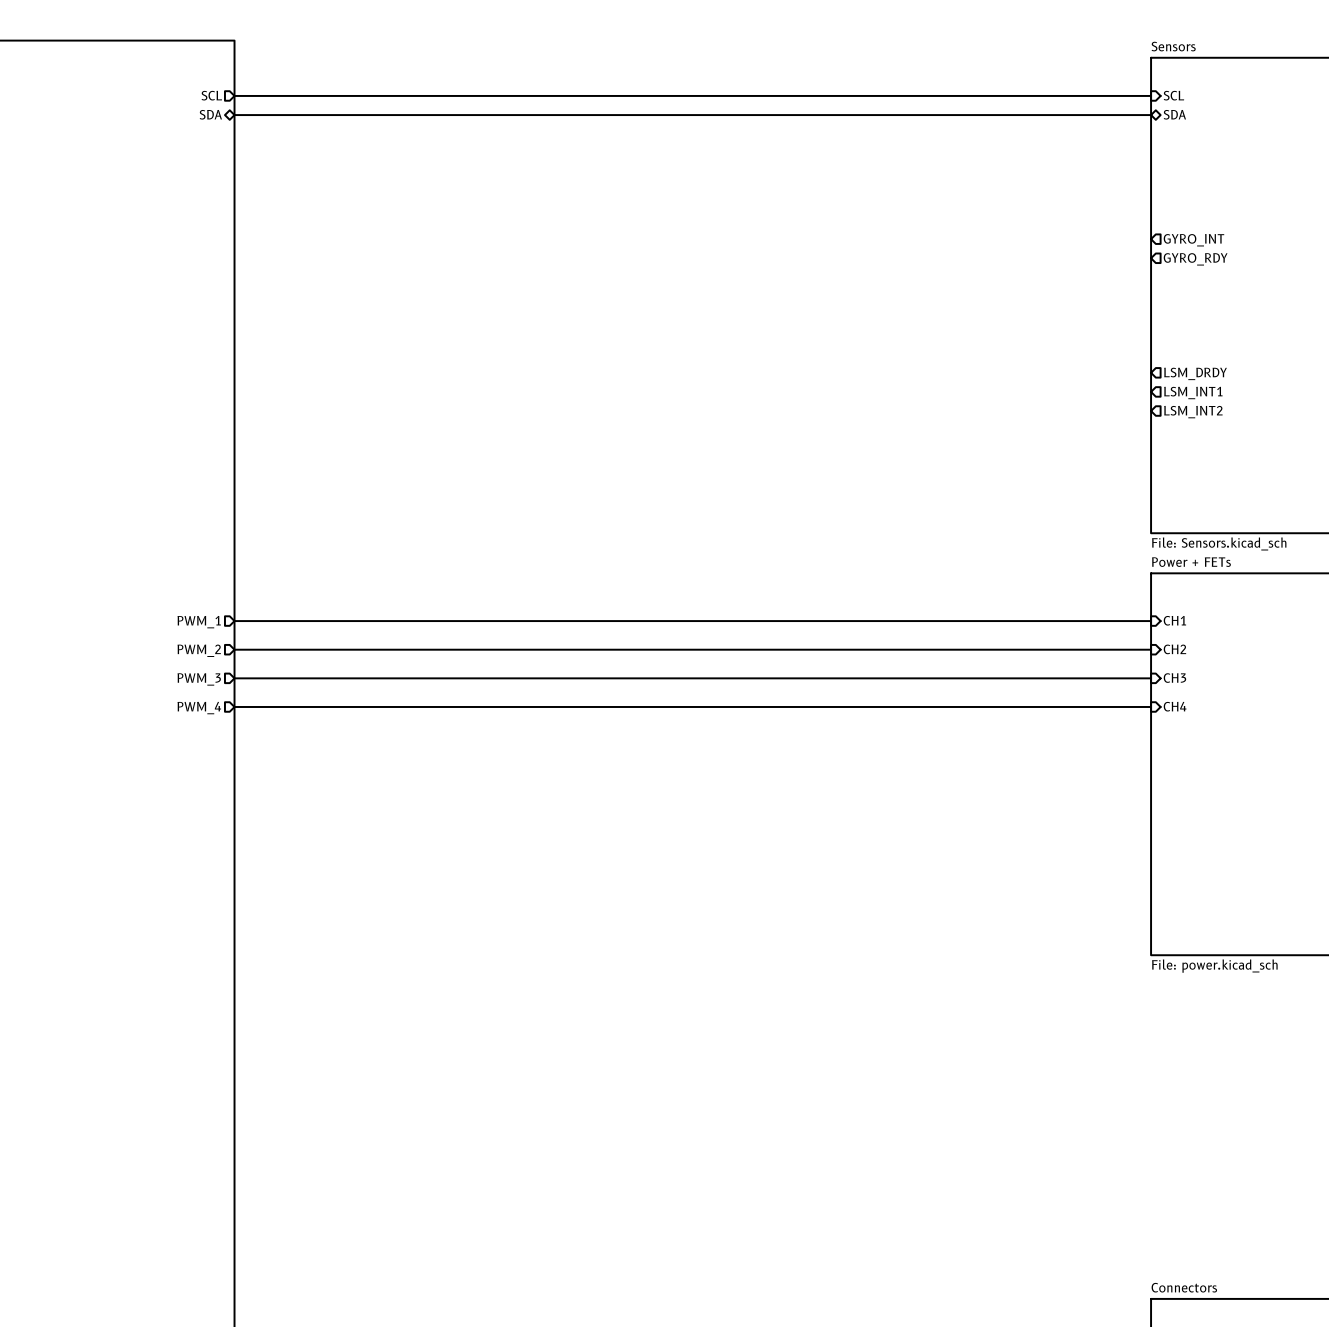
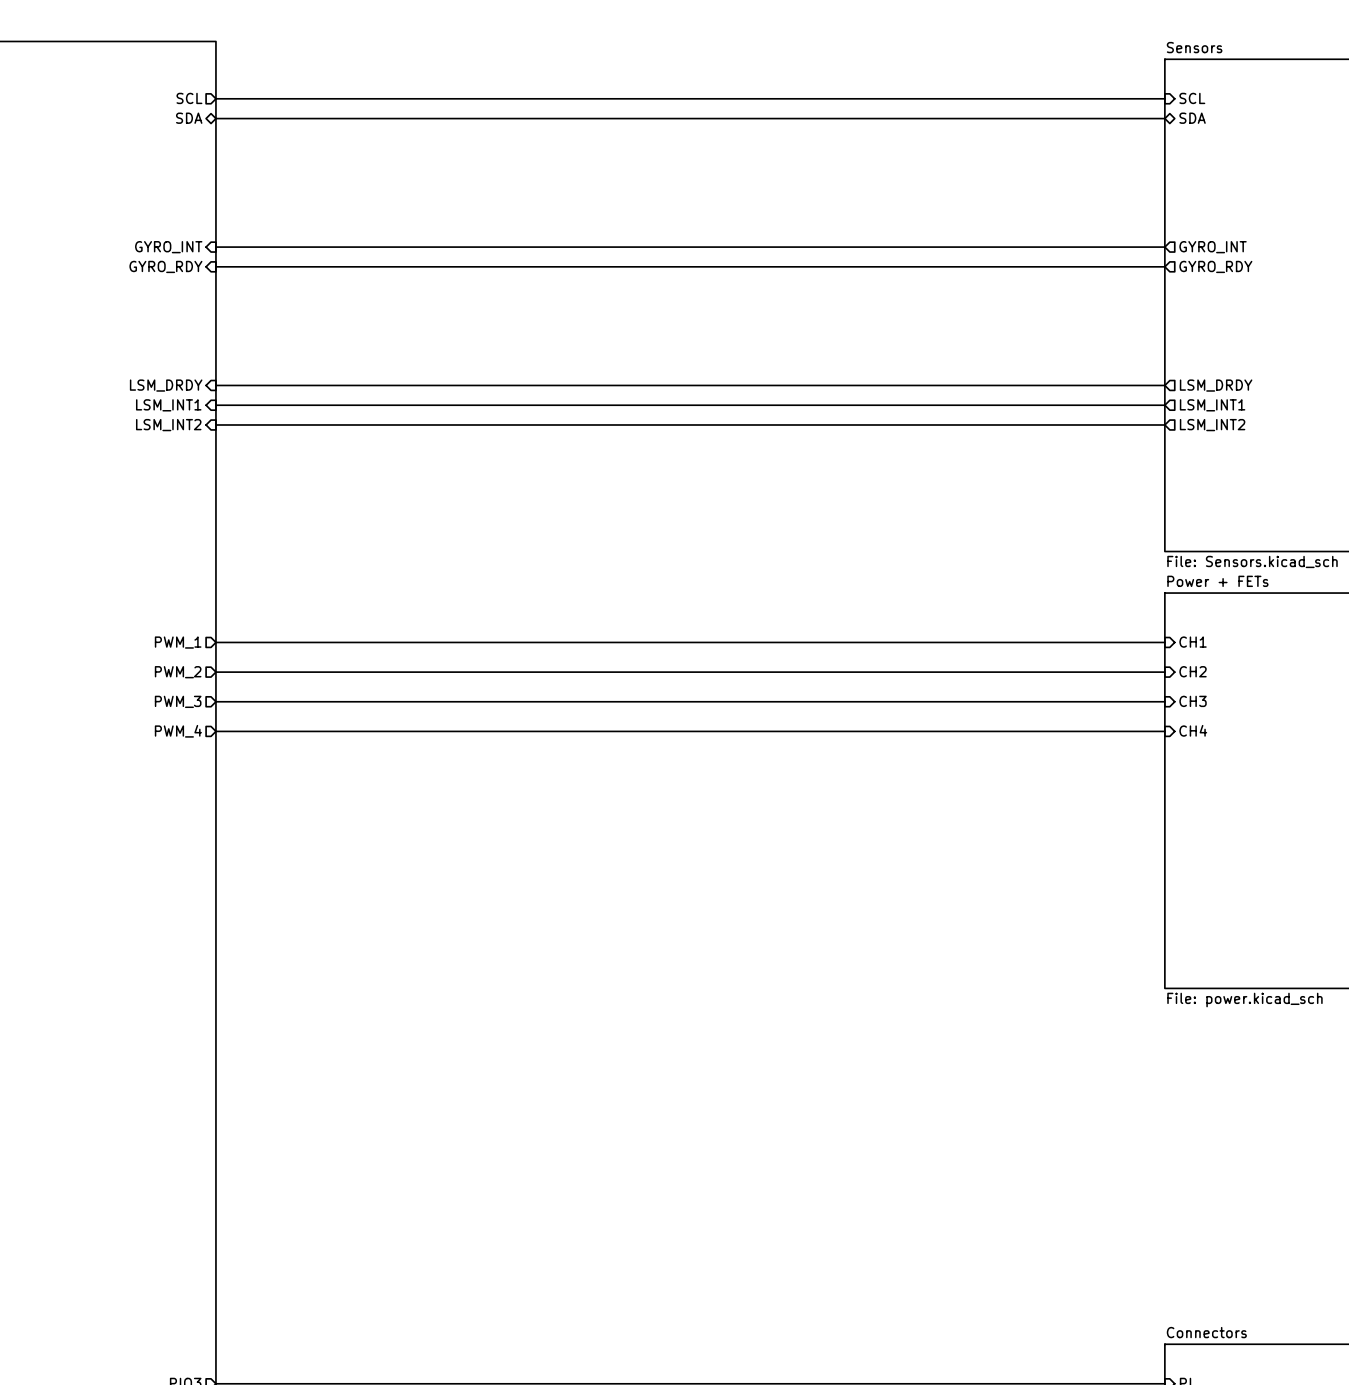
wire: none -> (215, 247) (1164, 247)
sheet pin: none -> GYRO_INT (168, 247)
wire: none -> (215, 266) (1164, 266)
sheet pin: none -> GYRO_RDY (165, 266)
wire: none -> (215, 385) (1164, 385)
sheet pin: none -> LSM_DRDY (166, 385)
wire: none -> (215, 405) (1164, 405)
sheet pin: none -> LSM_INT1 (168, 405)
wire: none -> (215, 425) (1164, 425)
sheet pin: none -> LSM_INT2 (168, 425)

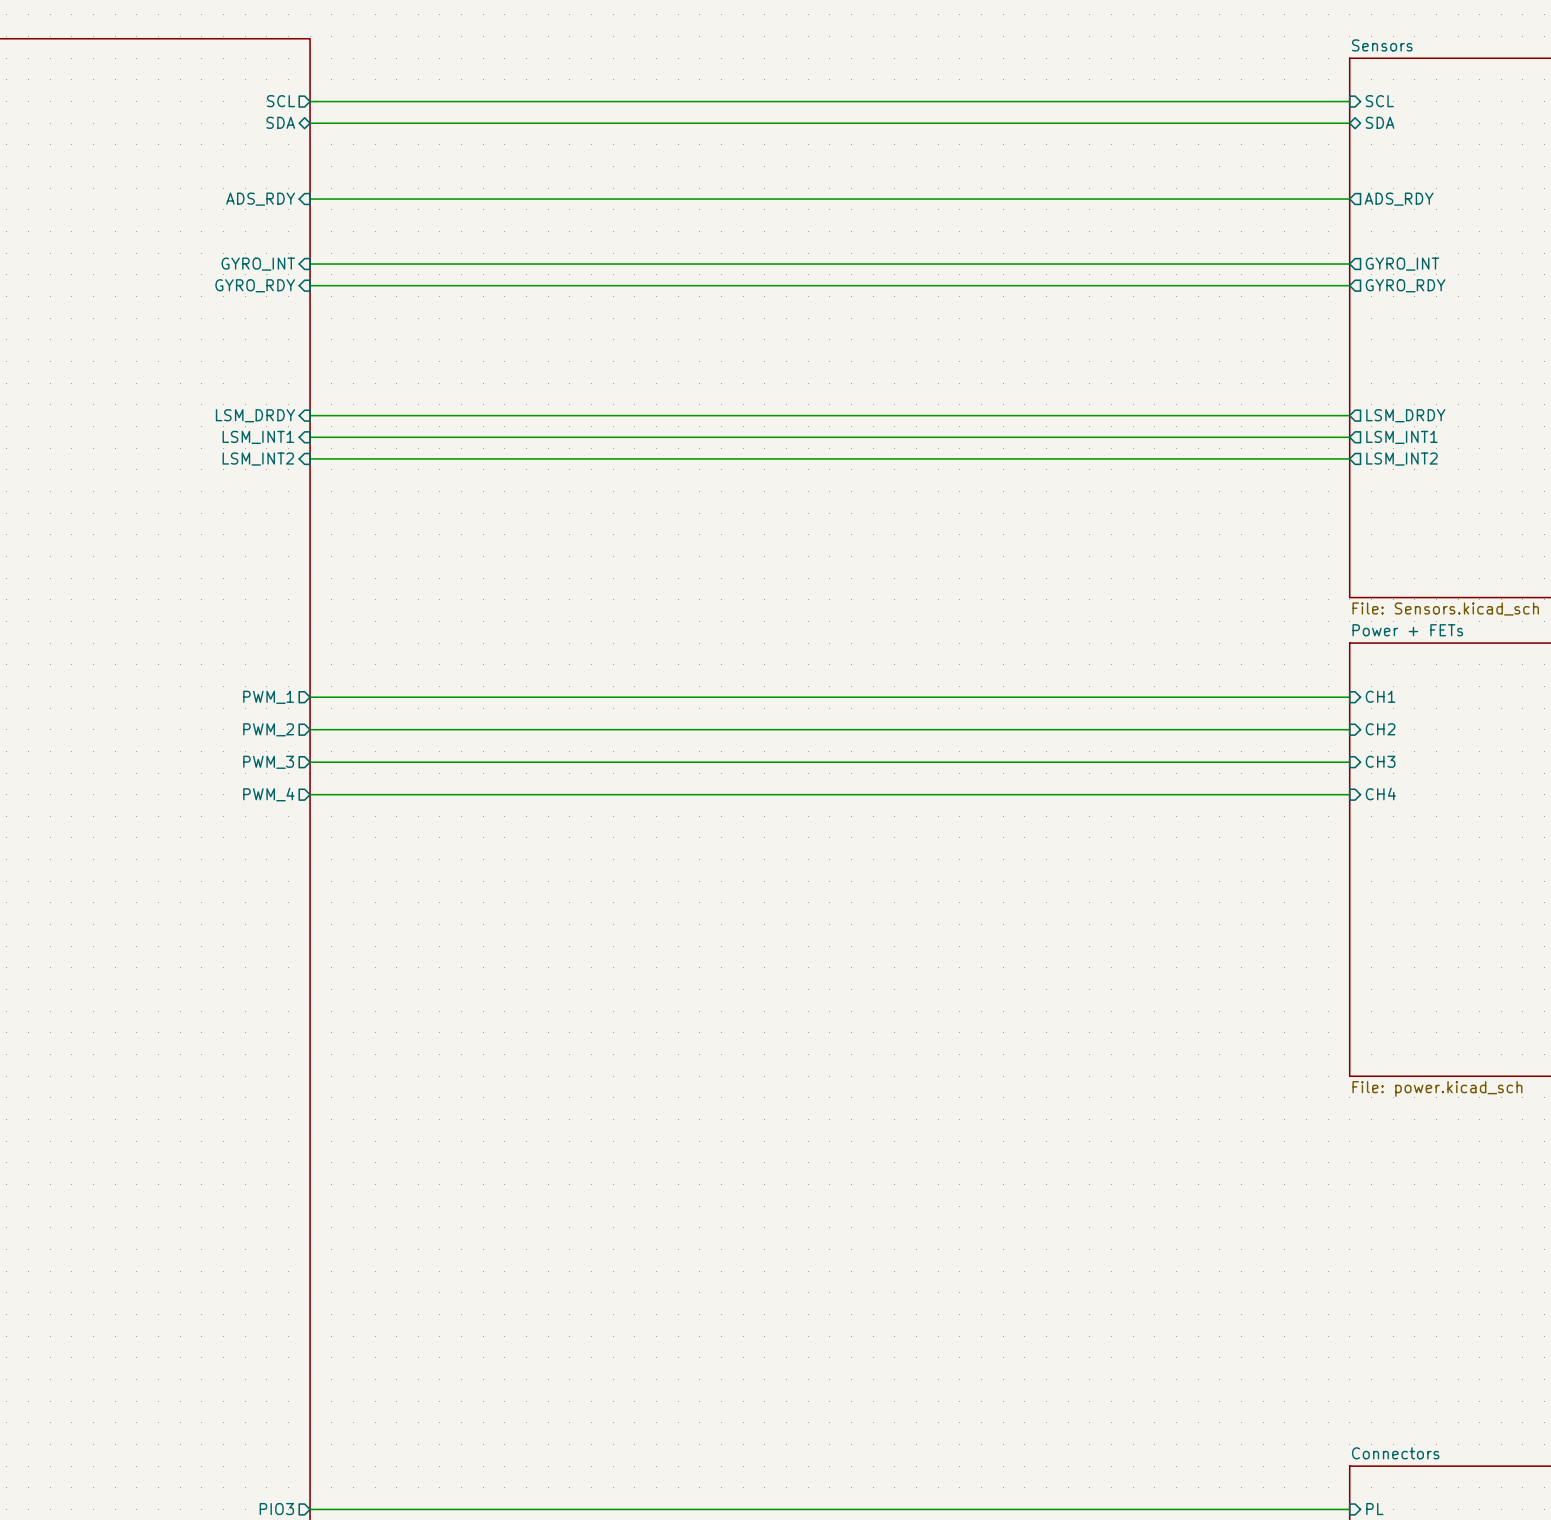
sheet pin: none -> ADS_RDY (260, 199)
wire: none -> (310, 199) (1349, 199)
sheet pin: none -> ADS_RDY (1399, 199)

